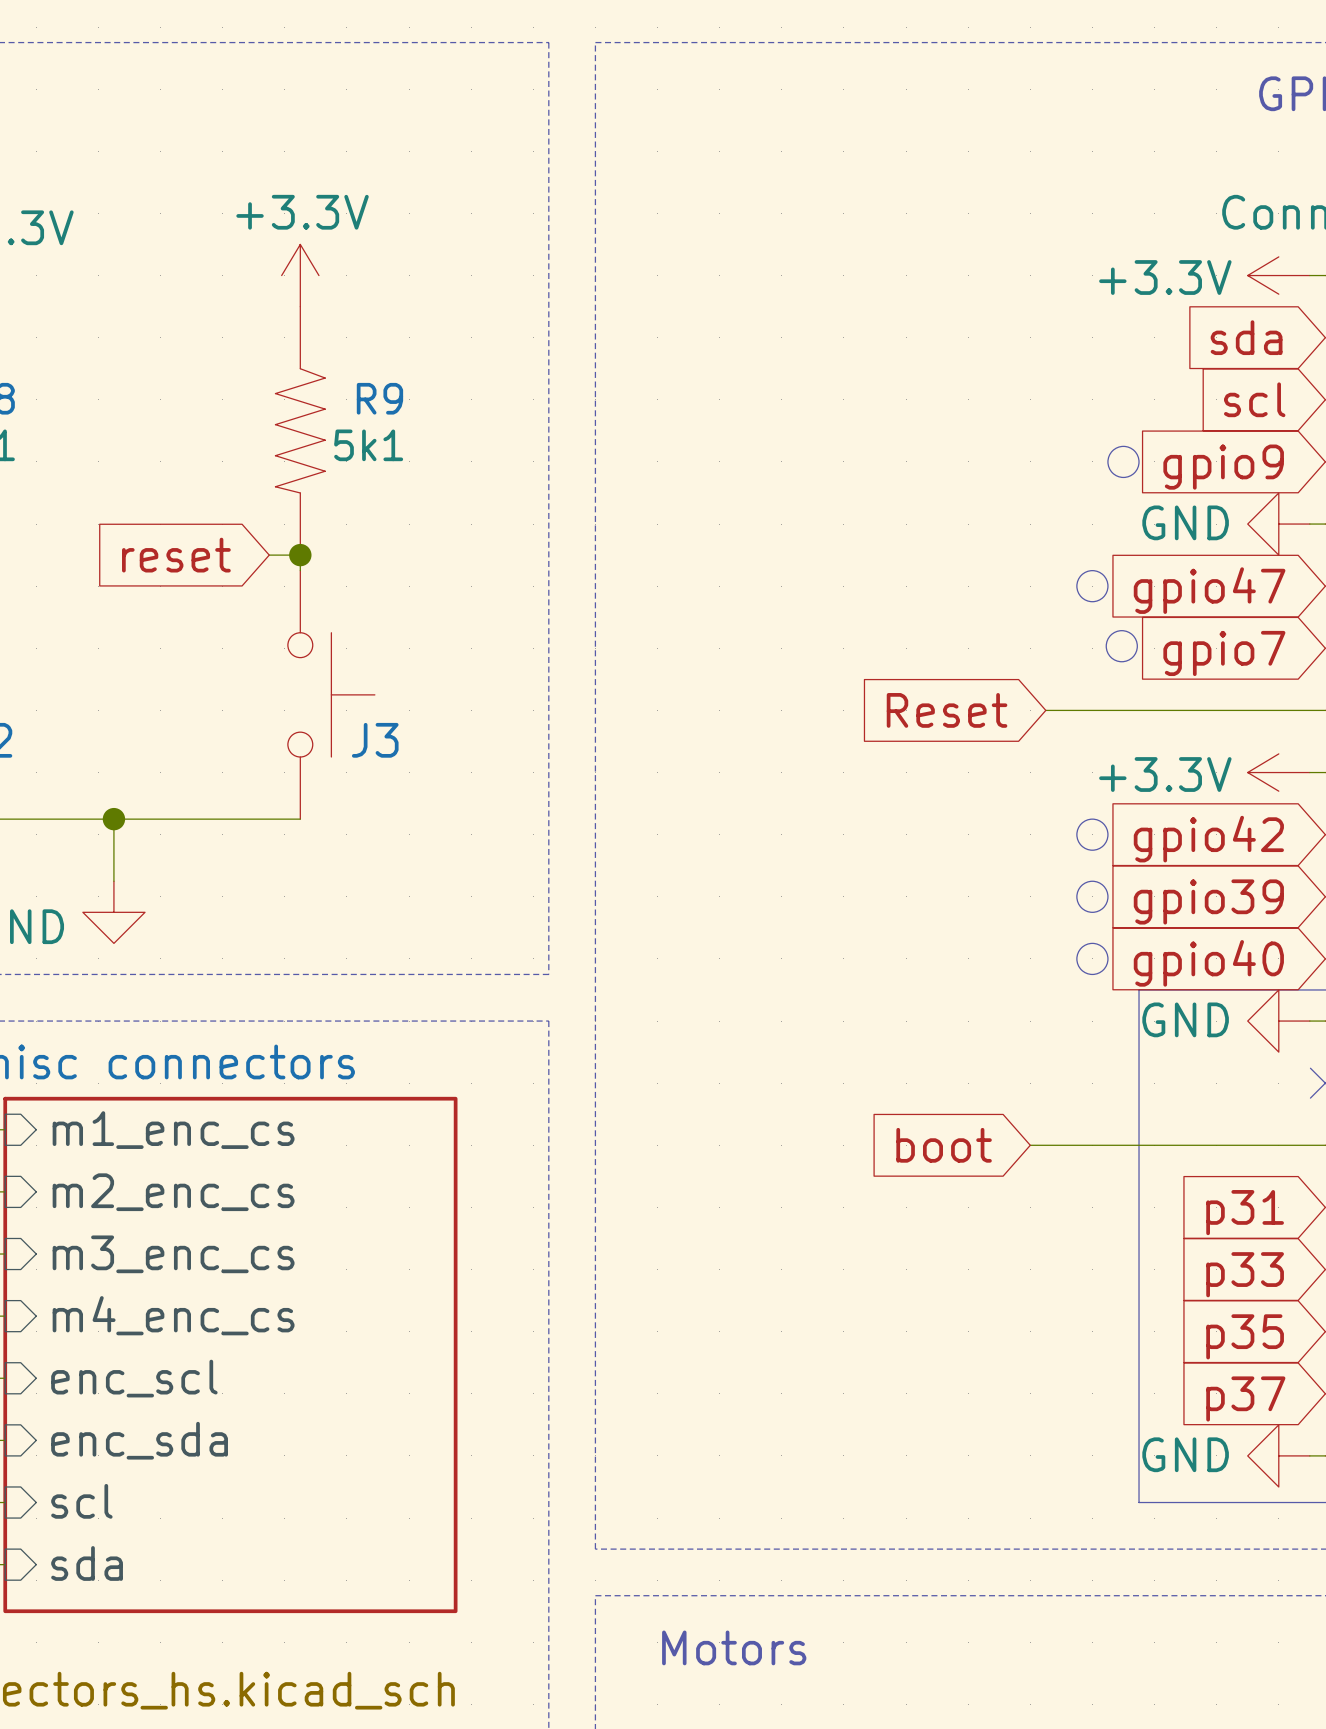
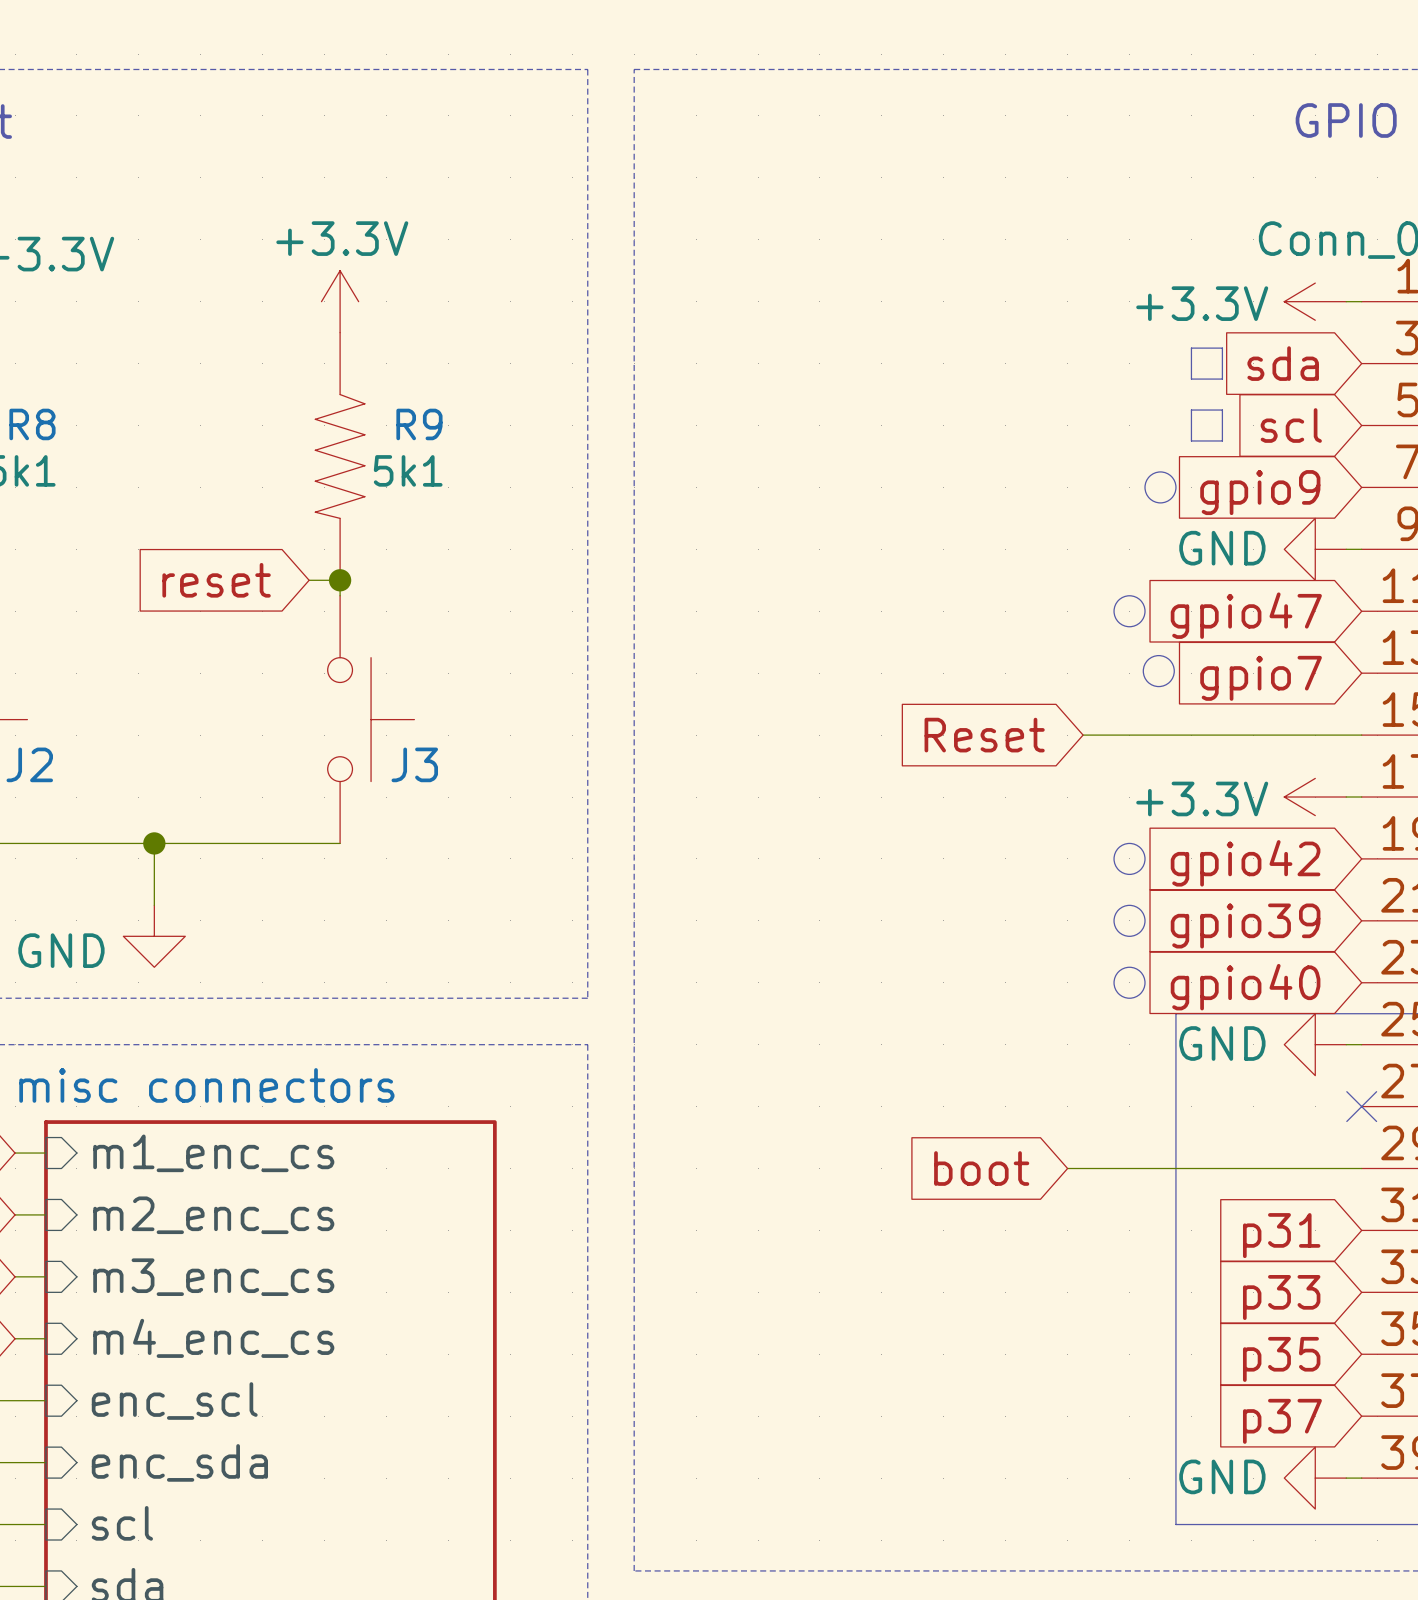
line: none -> (1191, 348) (1222, 348) (1222, 379) (1191, 379) (1191, 348)
line: none -> (1191, 410) (1191, 440) (1222, 440) (1222, 410) (1191, 410)

